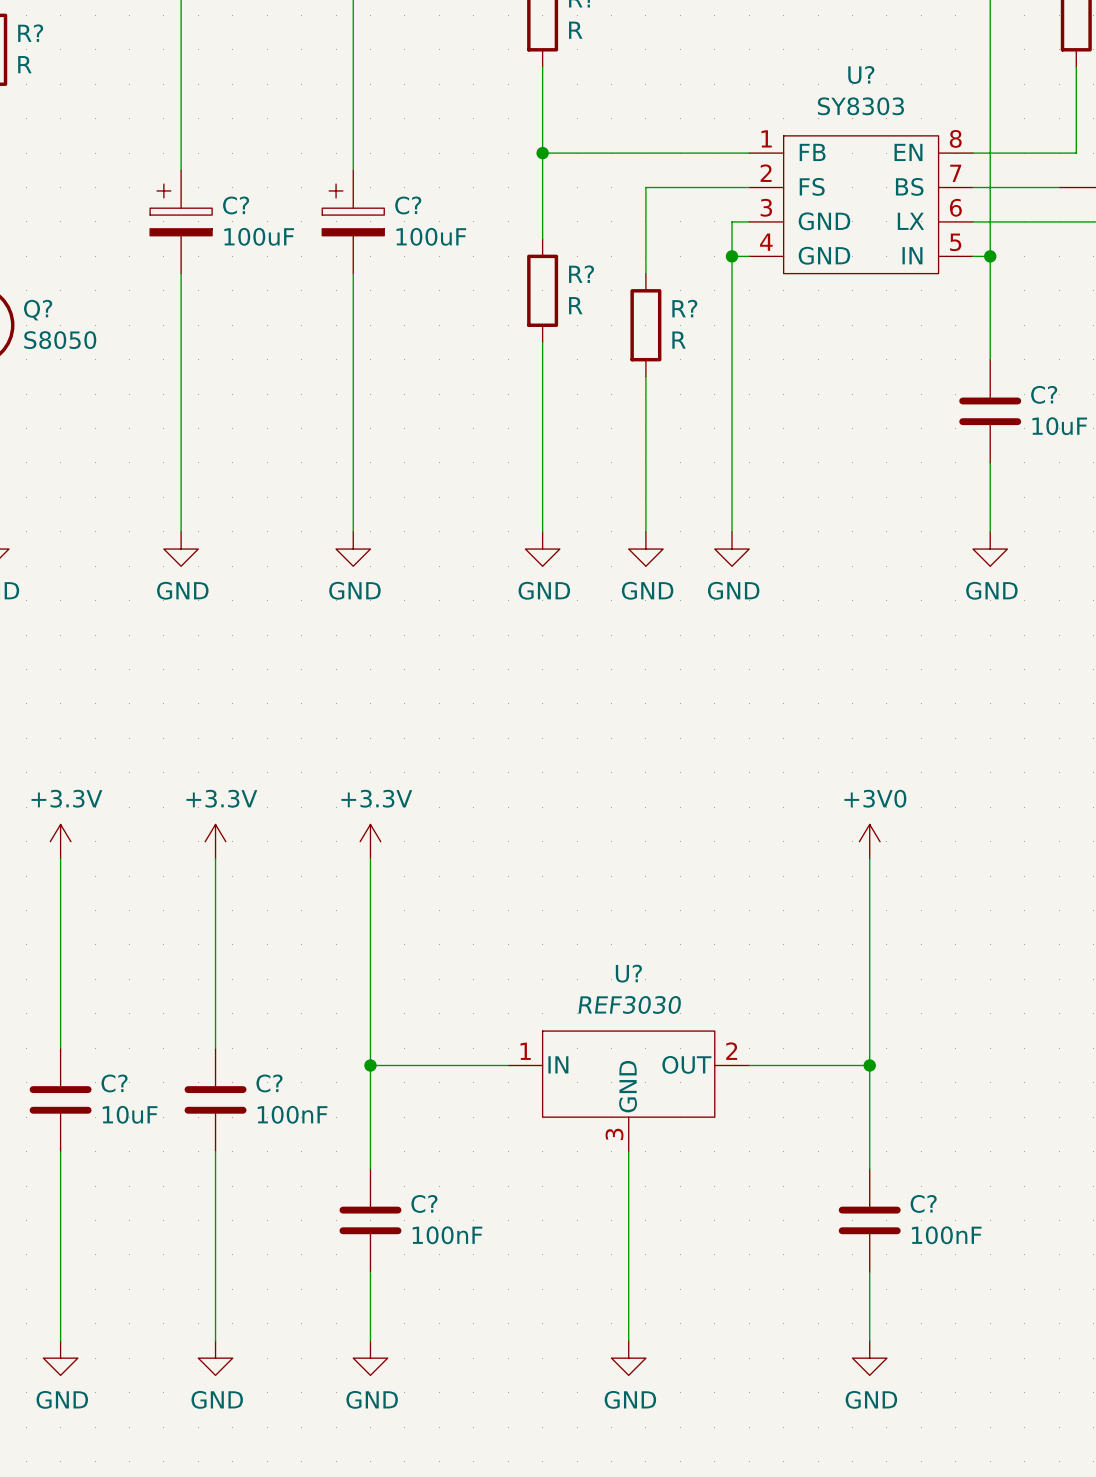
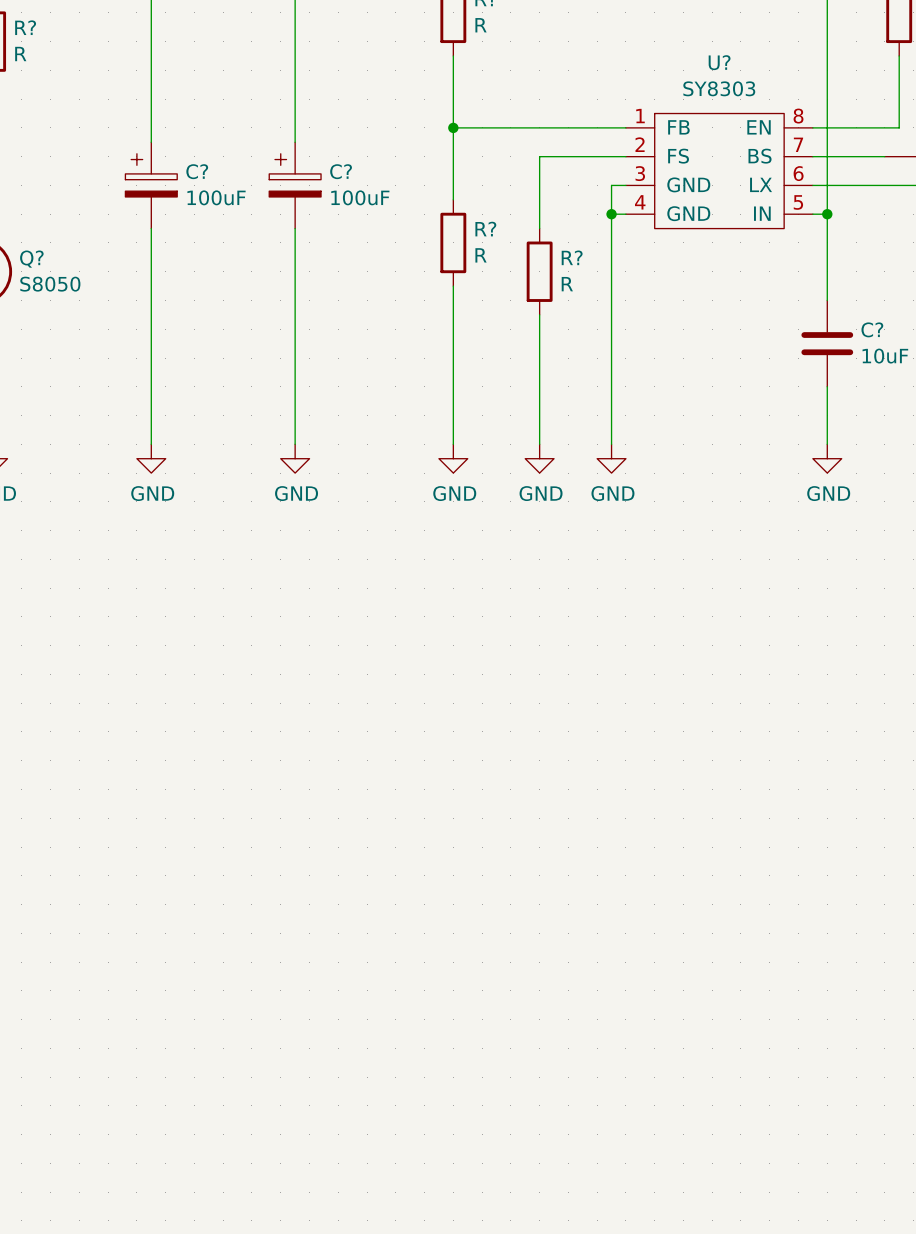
power symbol: +3.3V (60, 841) -> none
power symbol: +3.3V (215, 841) -> none
power symbol: +3.3V (370, 841) -> none
power symbol: +3V0 (869, 841) -> none
wire: (60, 858) (60, 1048) -> none
wire: (215, 858) (215, 1048) -> none
wire: (370, 858) (370, 1168) -> none
wire: (869, 858) (869, 1168) -> none
wire: (370, 1065) (508, 1065) -> none
junction: (370, 1065) -> none
wire: (749, 1065) (869, 1065) -> none
junction: (869, 1065) -> none
U?: REF3030 (628, 1091) -> none
C?: 10uF (60, 1099) -> none
C?: 100nF (215, 1099) -> none
wire: (60, 1151) (60, 1340) -> none
wire: (215, 1151) (215, 1340) -> none
wire: (628, 1151) (628, 1340) -> none
C?: 100nF (370, 1220) -> none
C?: 100nF (869, 1220) -> none
wire: (370, 1272) (370, 1340) -> none
wire: (869, 1272) (869, 1340) -> none
power symbol: GND (60, 1358) -> none
power symbol: GND (215, 1358) -> none
power symbol: GND (370, 1358) -> none
power symbol: GND (628, 1358) -> none
power symbol: GND (869, 1358) -> none

